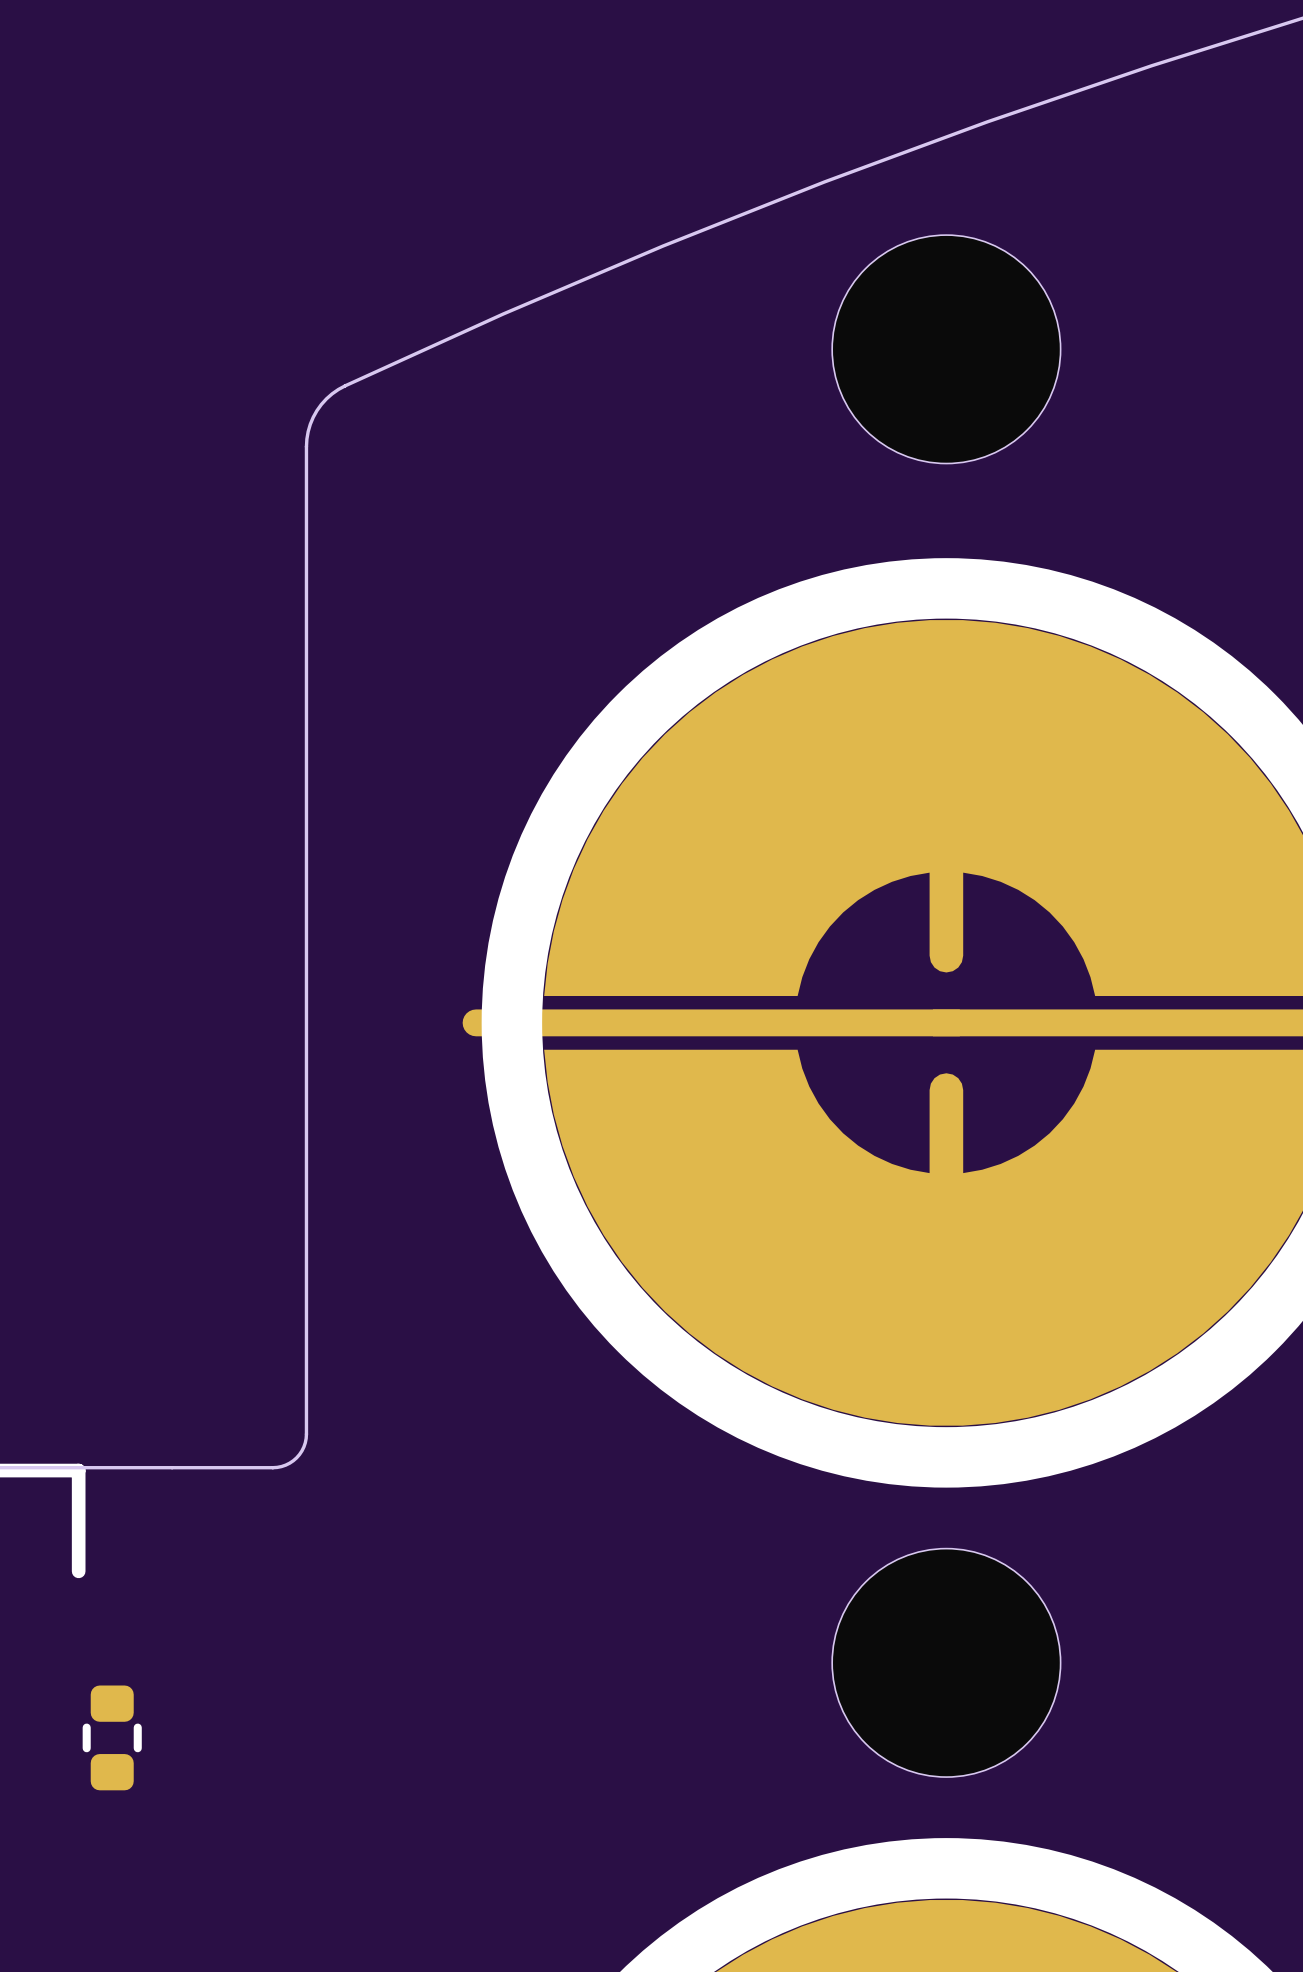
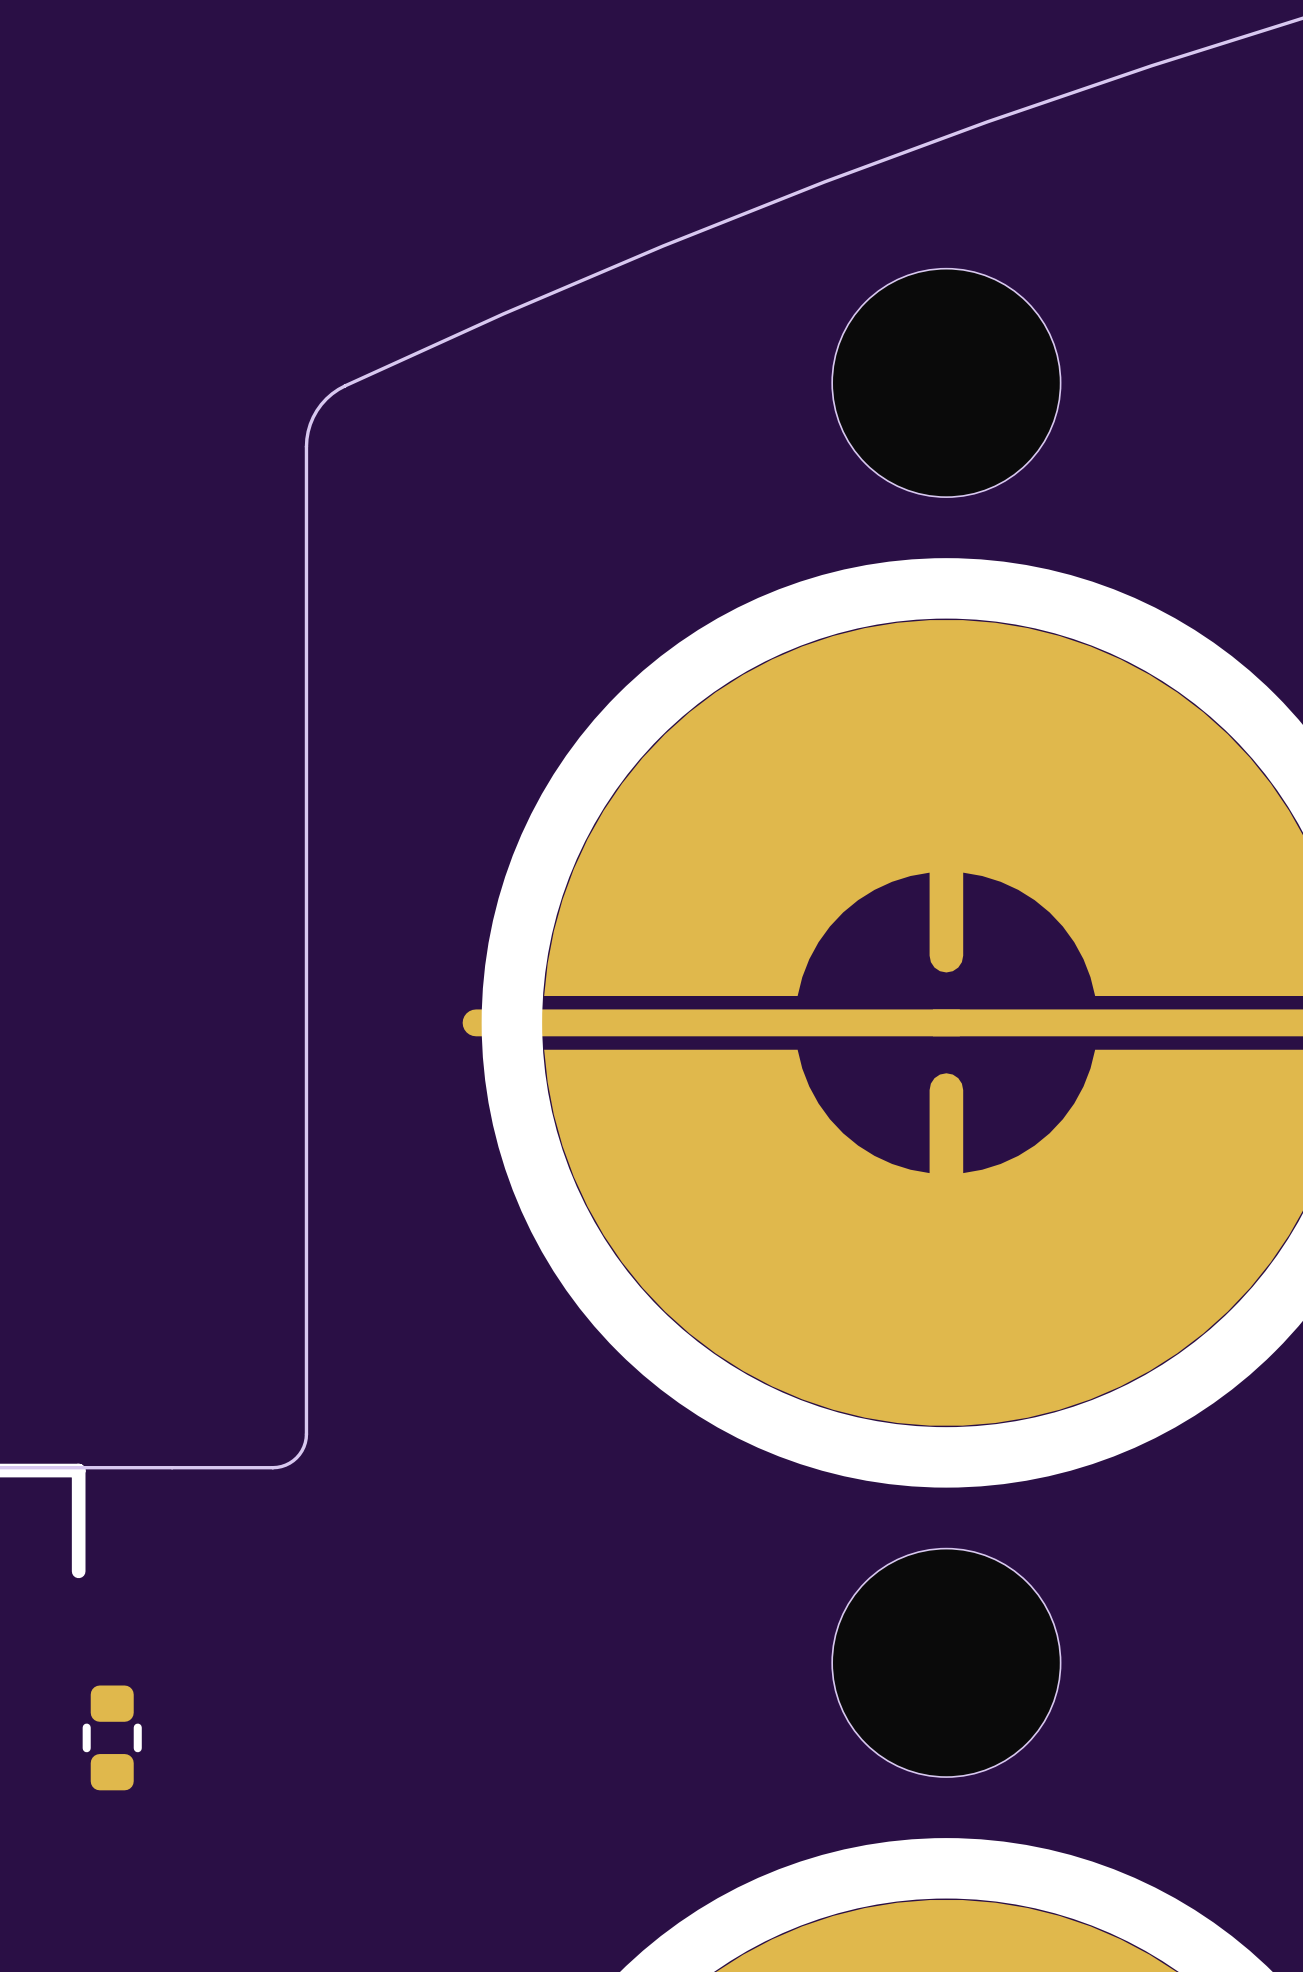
part position: (946, 349) -> (946, 382)

